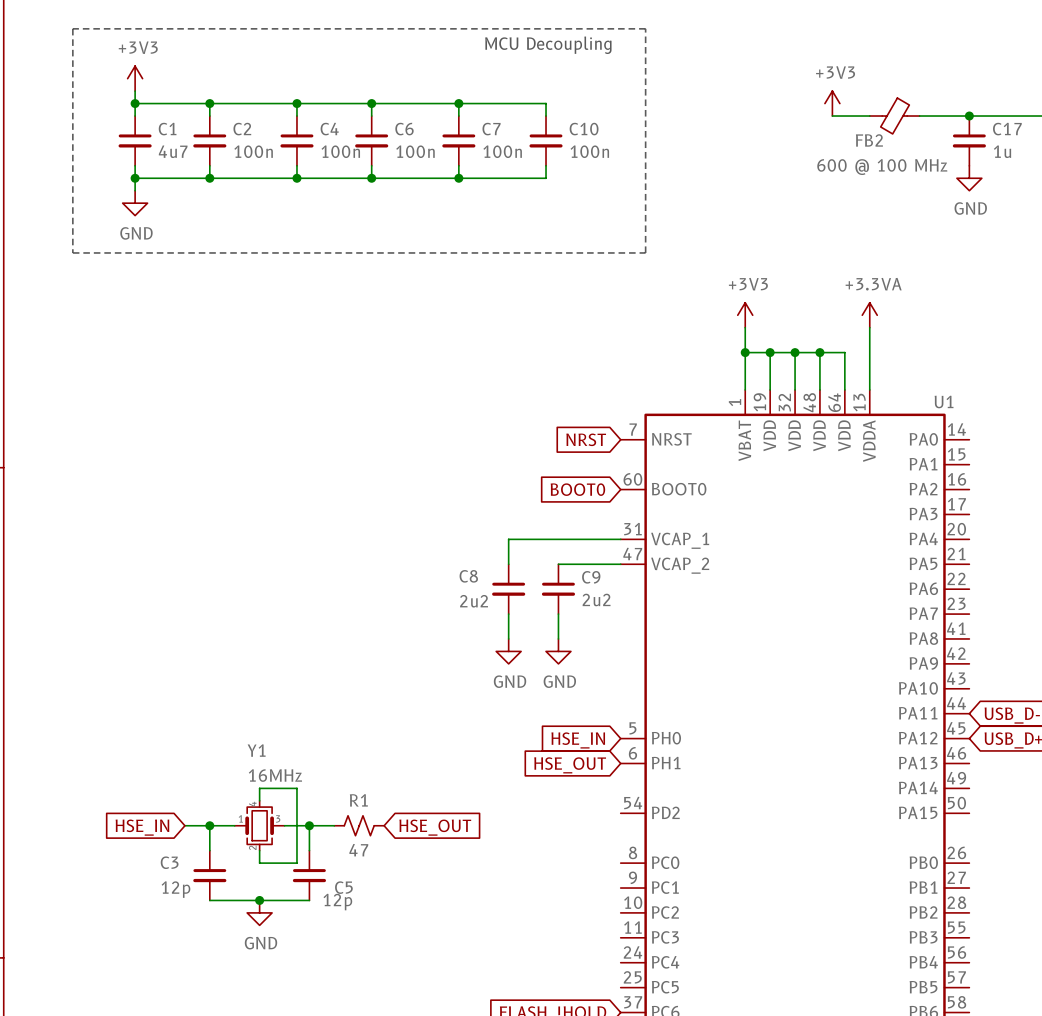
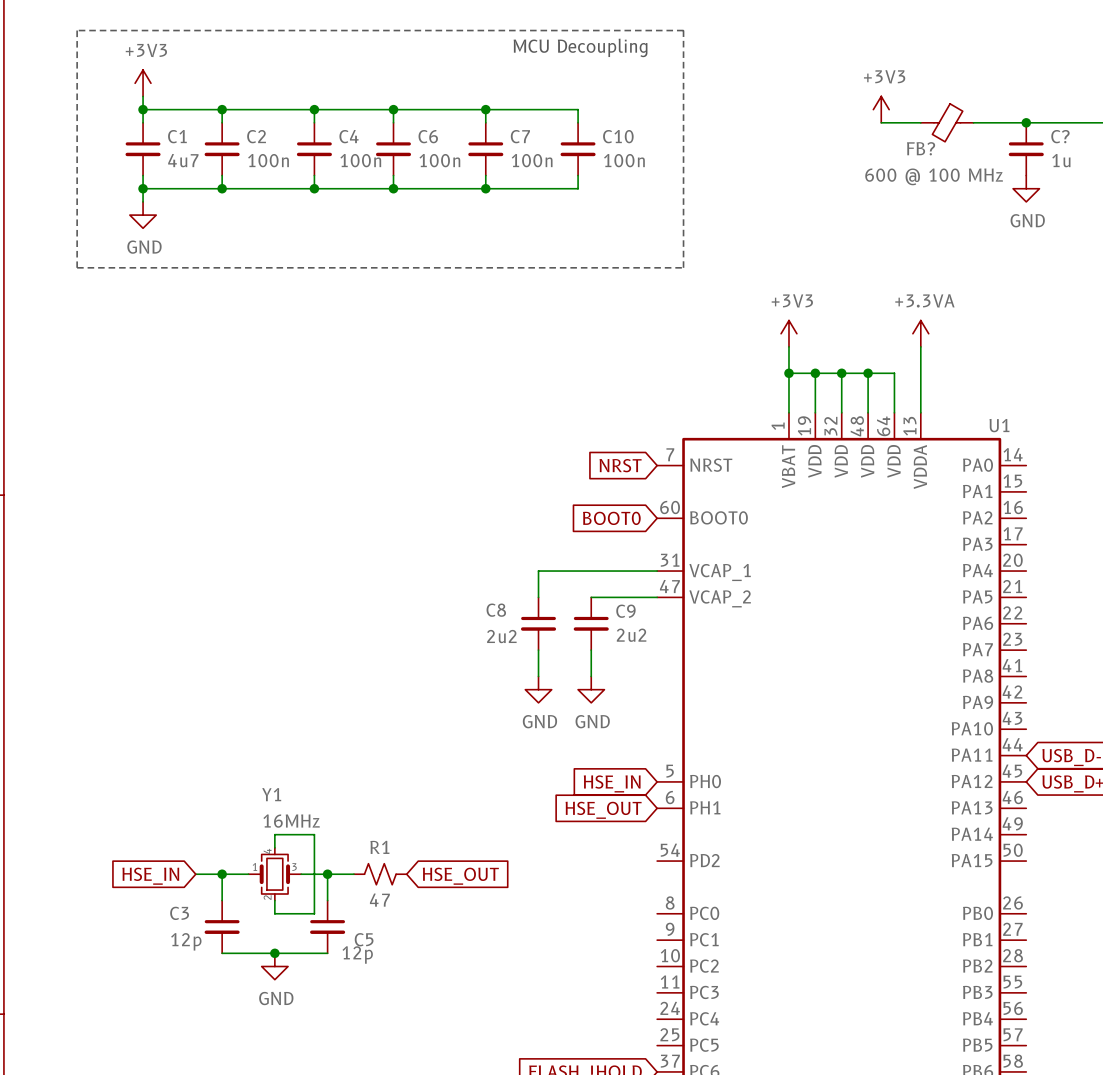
C17 name: C17 (1007, 129) -> C? (1060, 136)
FB2 name: FB2 (869, 140) -> FB? (921, 148)

